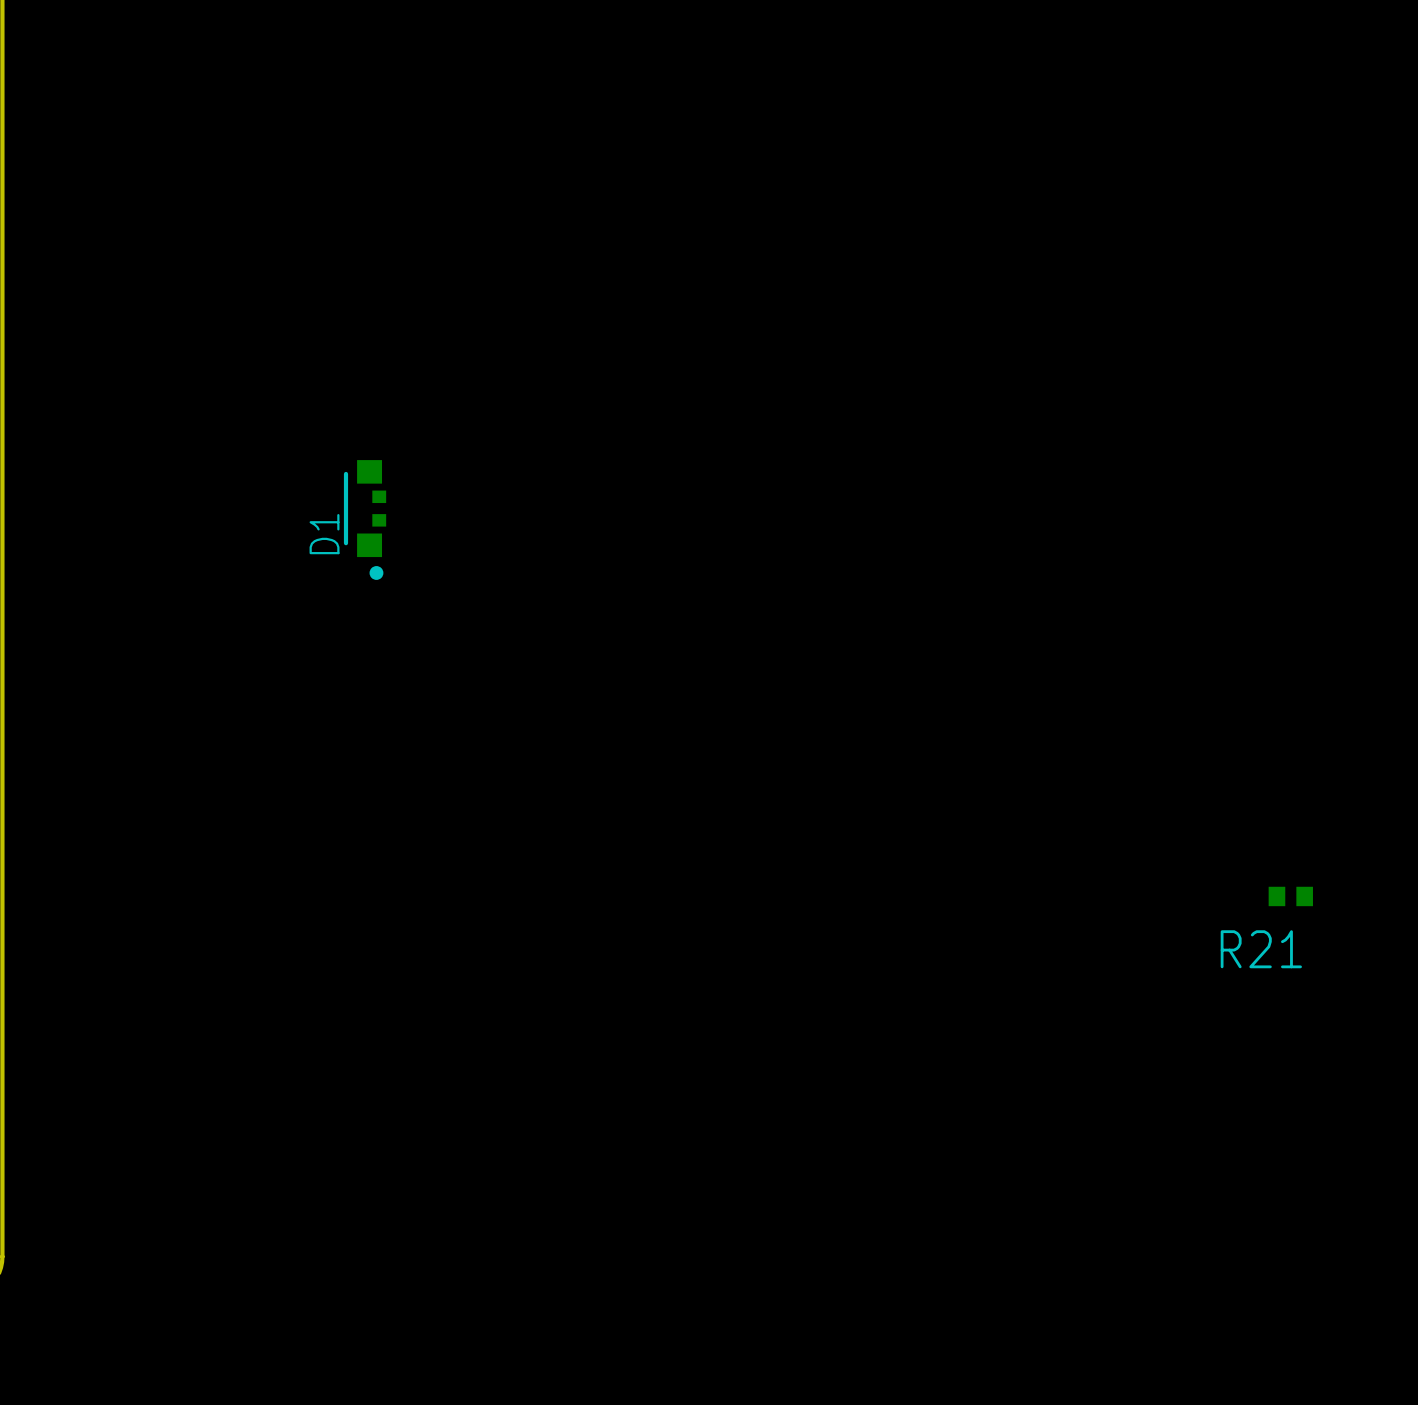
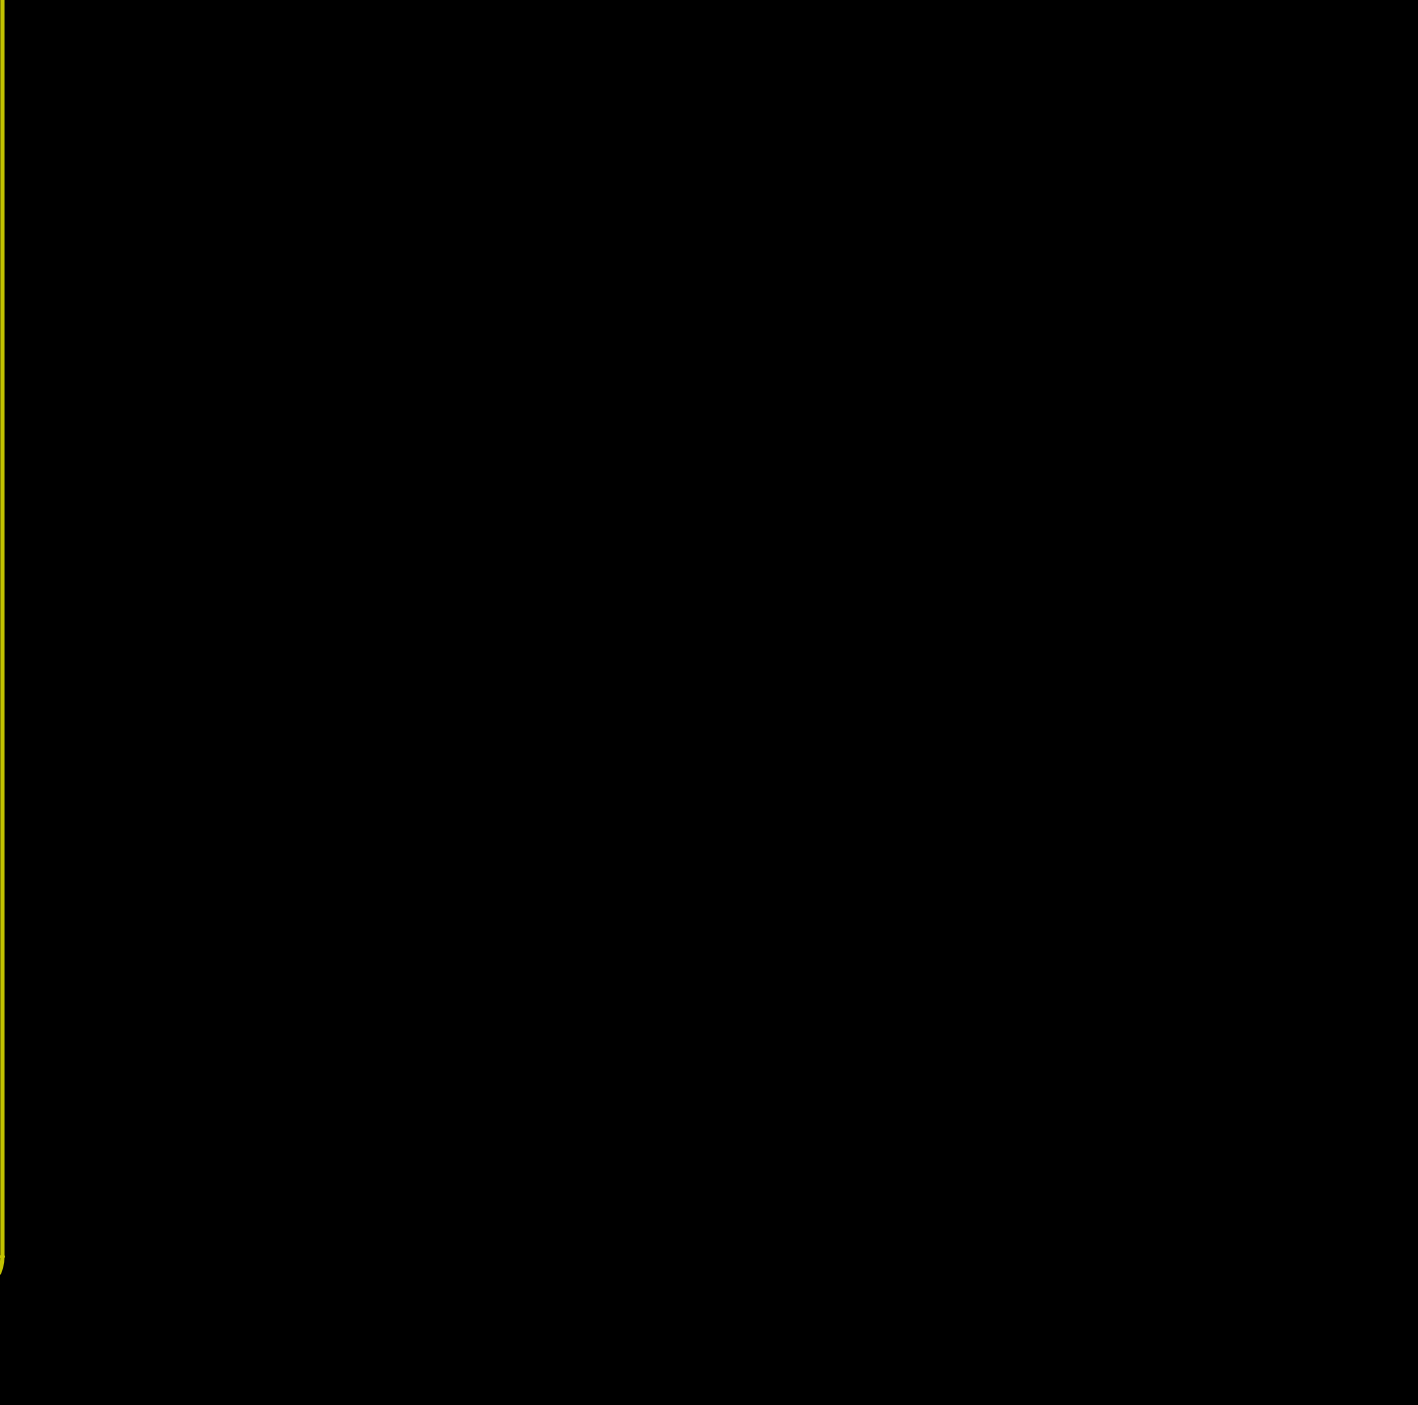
D1: (365, 520) -> none
R21: (1290, 896) -> none

